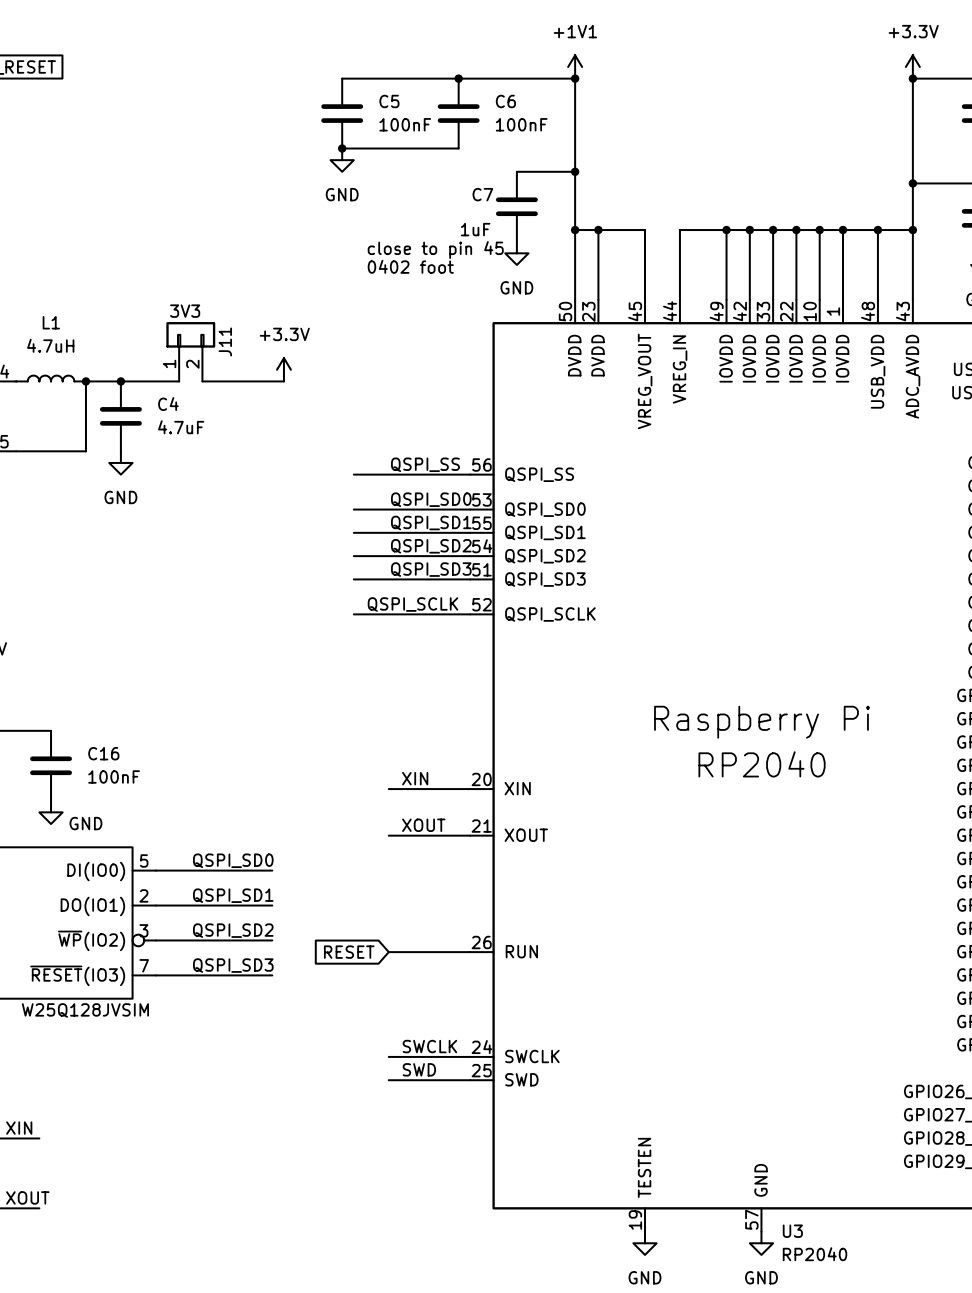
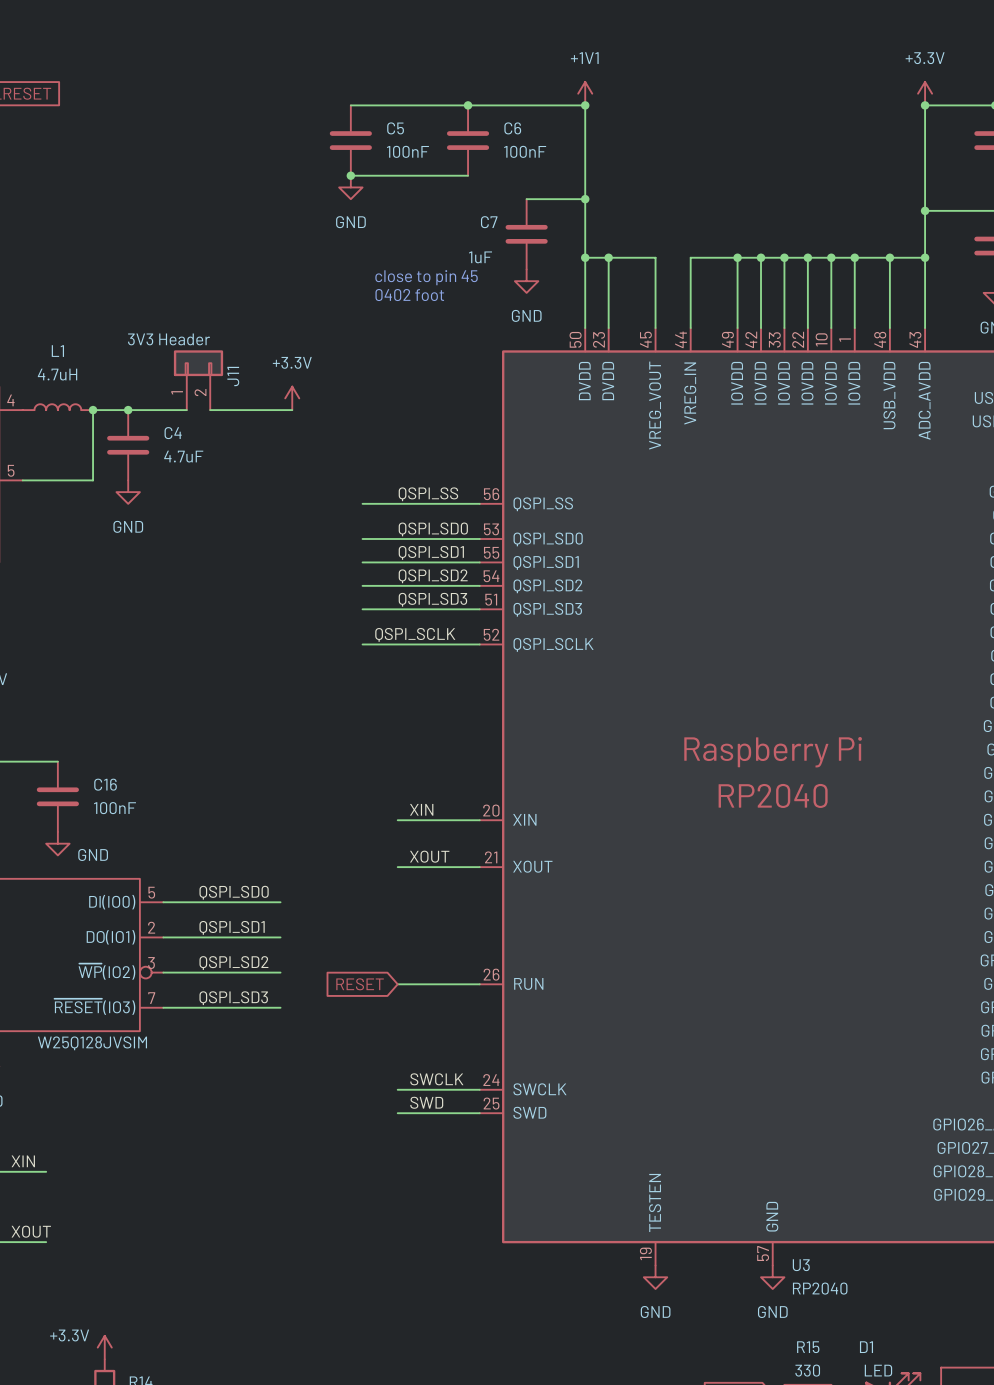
J11 value: 3V3 (185, 311) -> 3V3 Header (169, 339)

